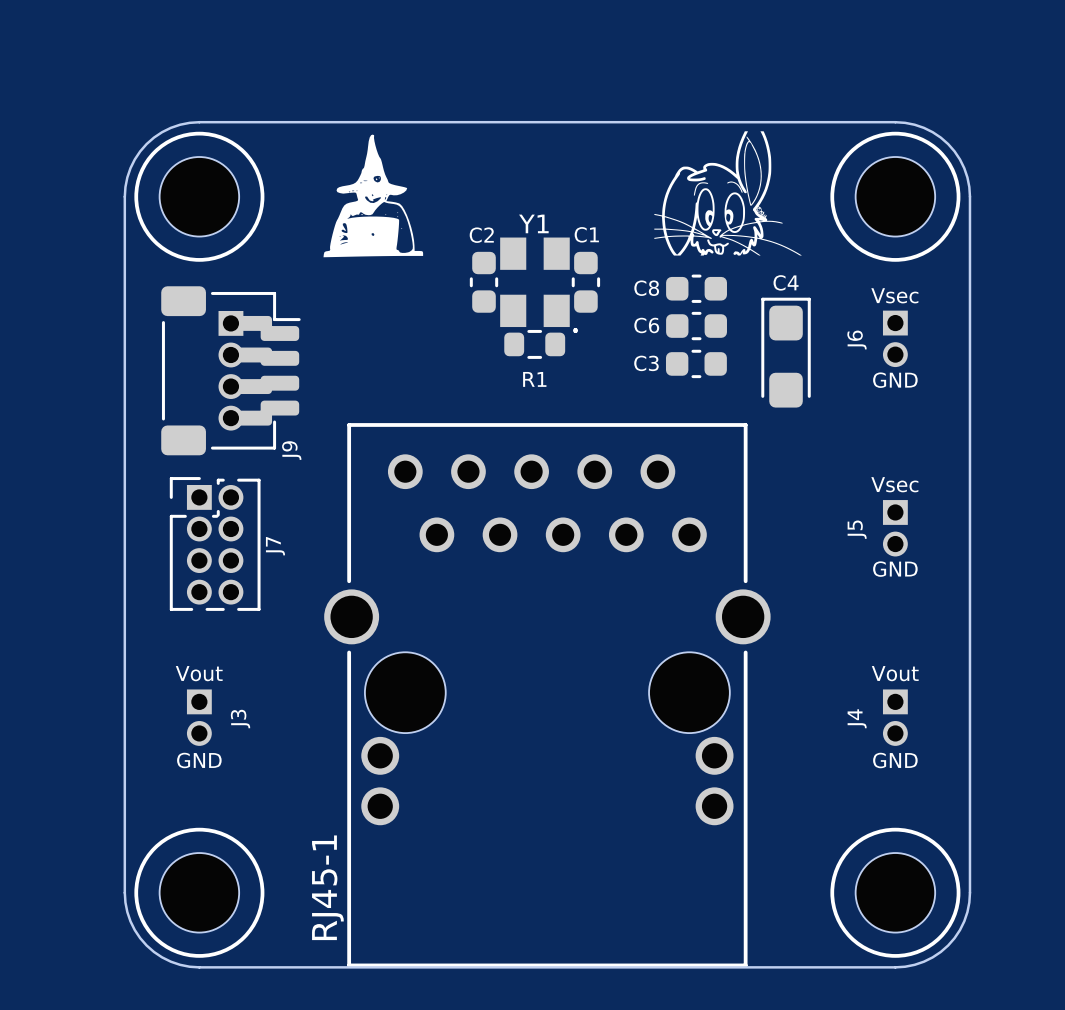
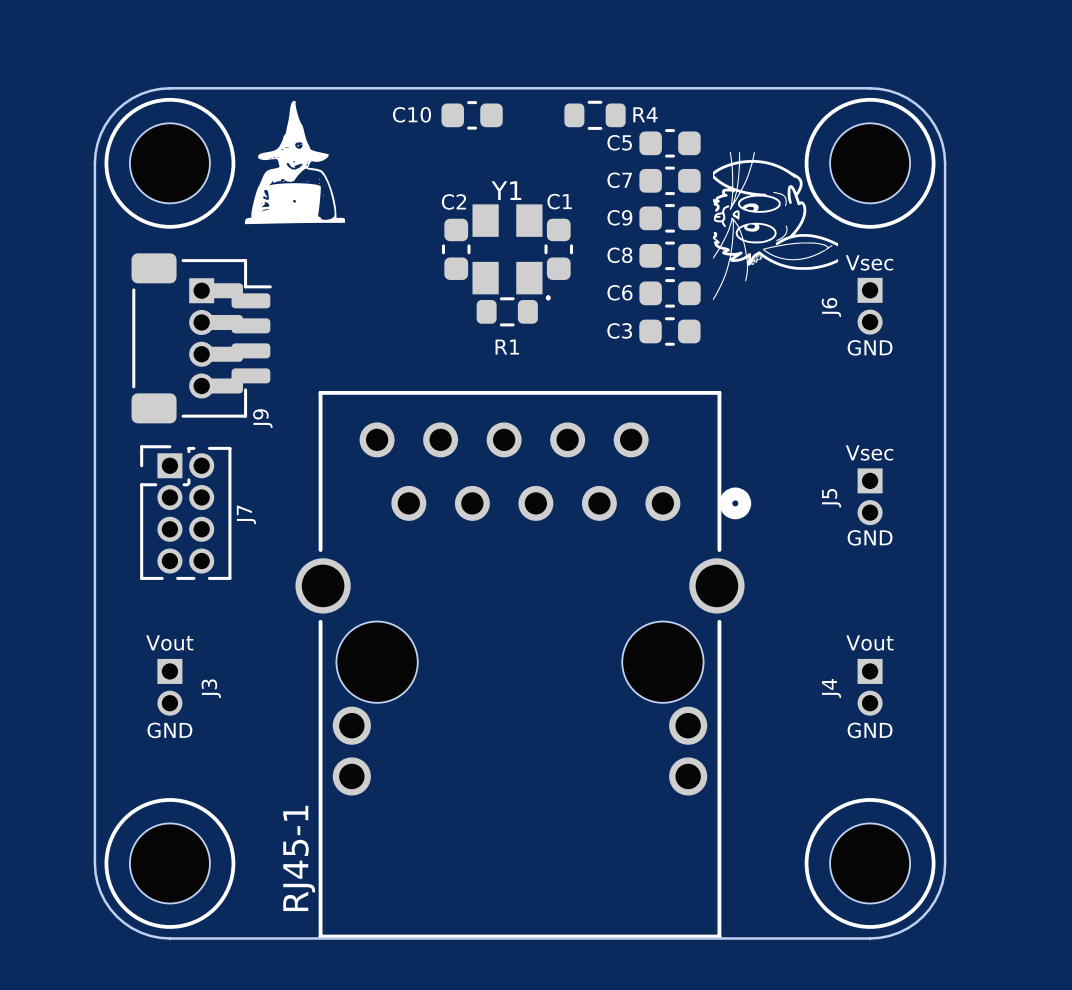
drawing: [654, 131, 802, 256] -> none
C10: none -> (472, 115)
R4: none -> (595, 115)
C5: none -> (670, 143)
drawing: none -> [713, 152, 839, 301]
drawing position: (373, 195) -> (294, 162)
C7: none -> (670, 180)
C9: none -> (670, 218)
C4: (786, 352) -> none
RJ45-1 footprint: [324, 423, 771, 968] -> [295, 390, 752, 939]

